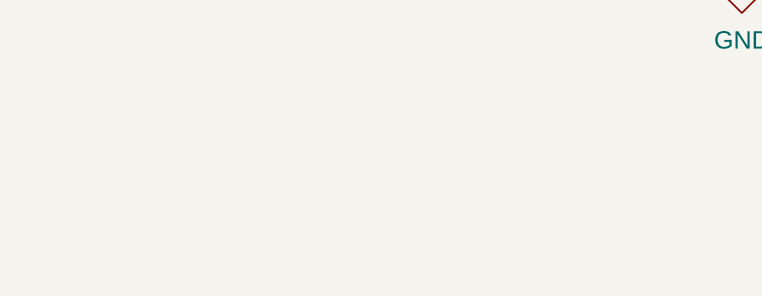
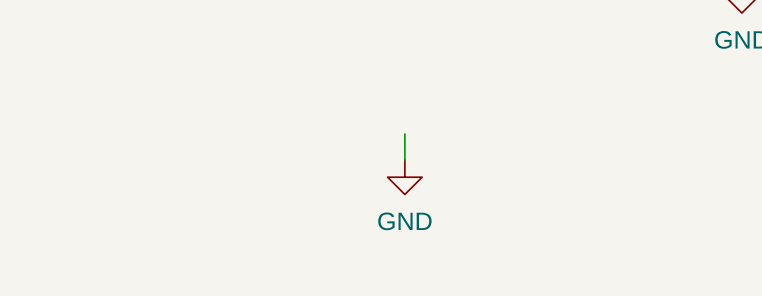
wire: none -> (404, 134) (404, 159)
power symbol: none -> GND (404, 177)

